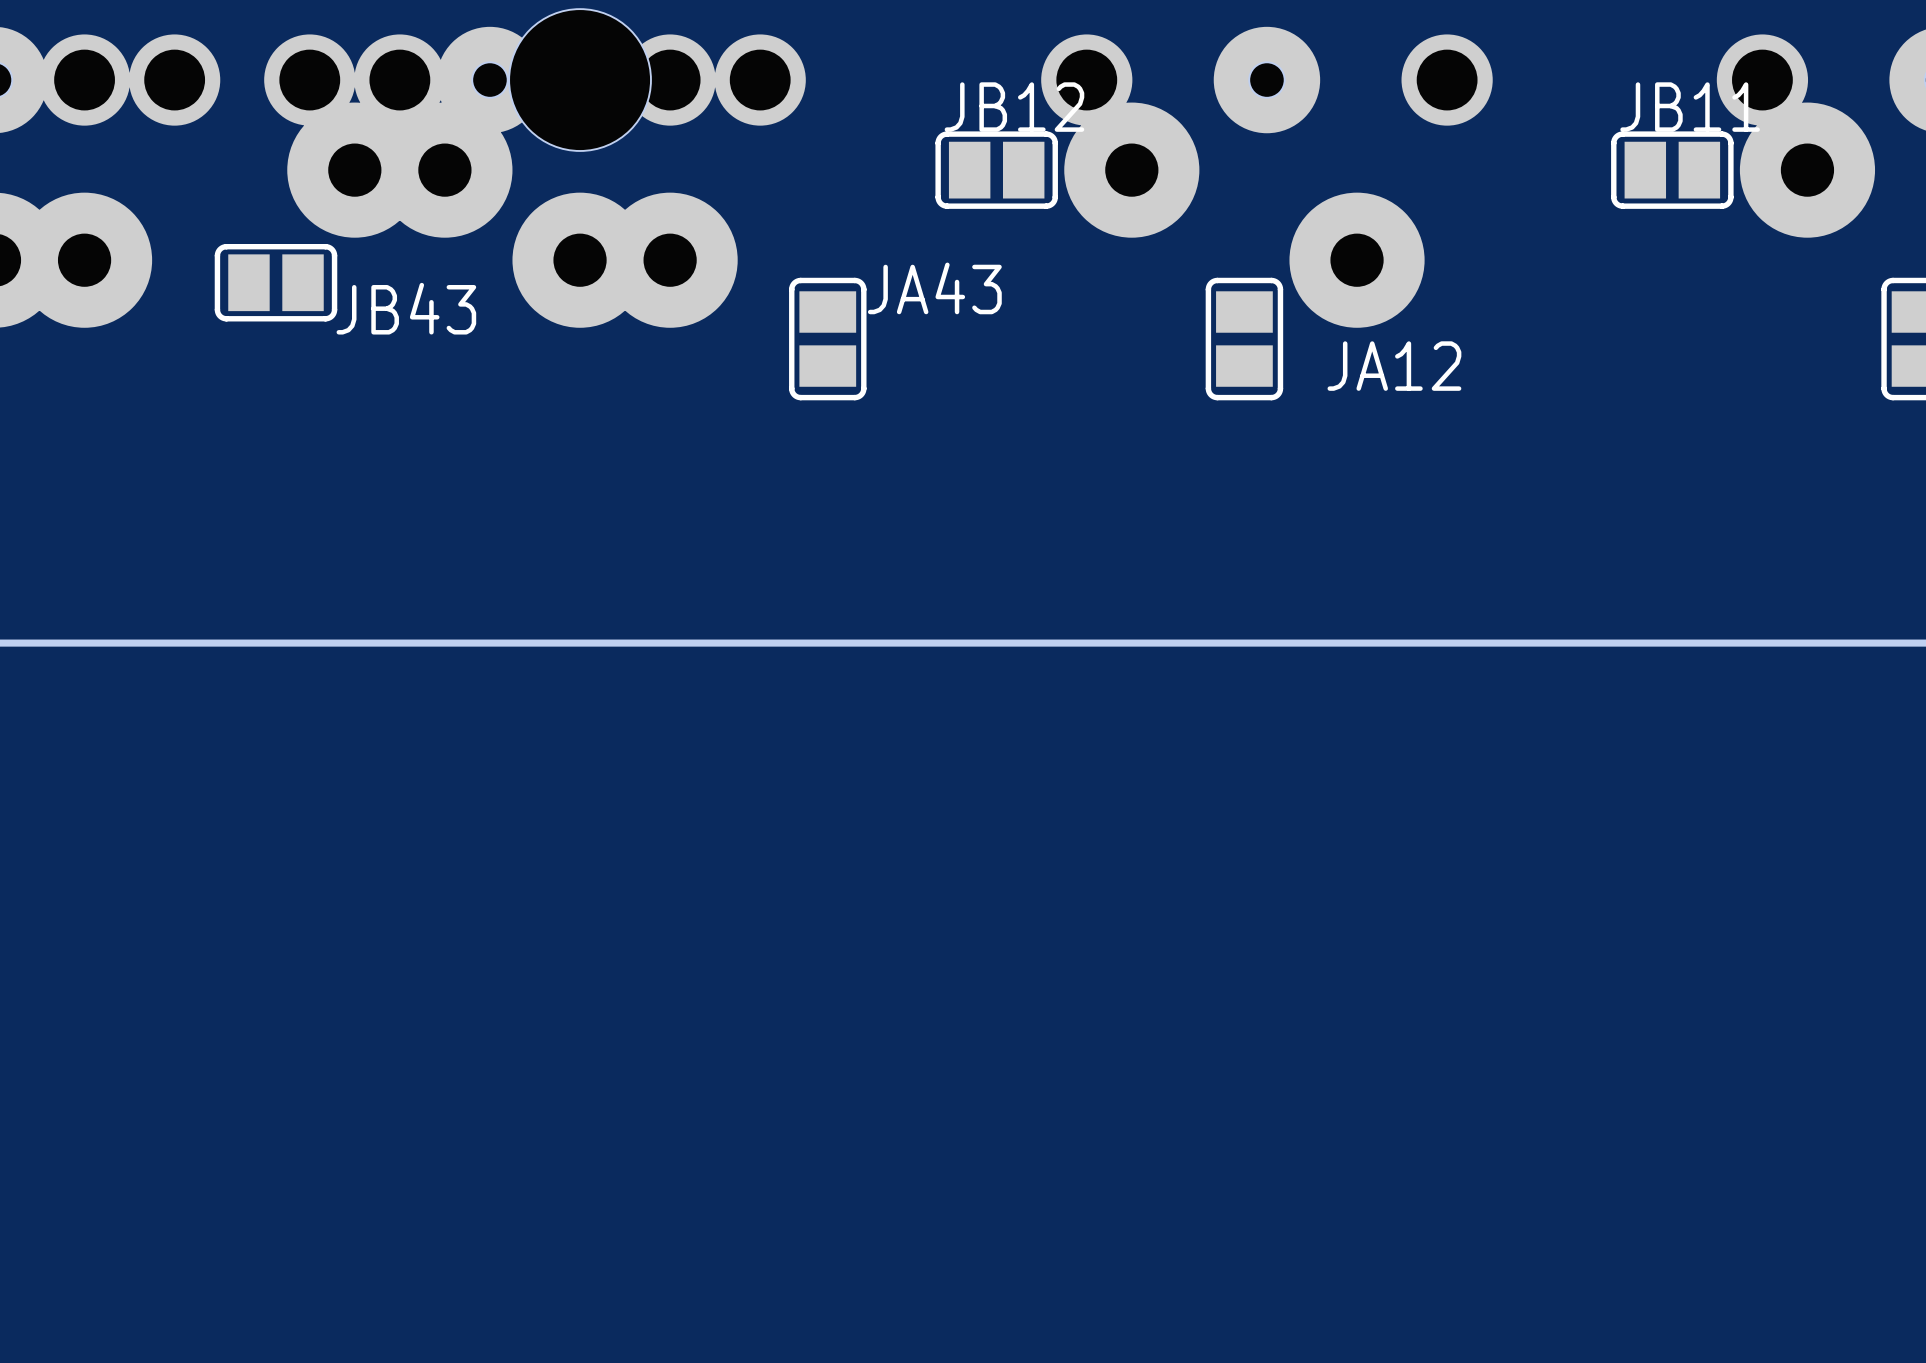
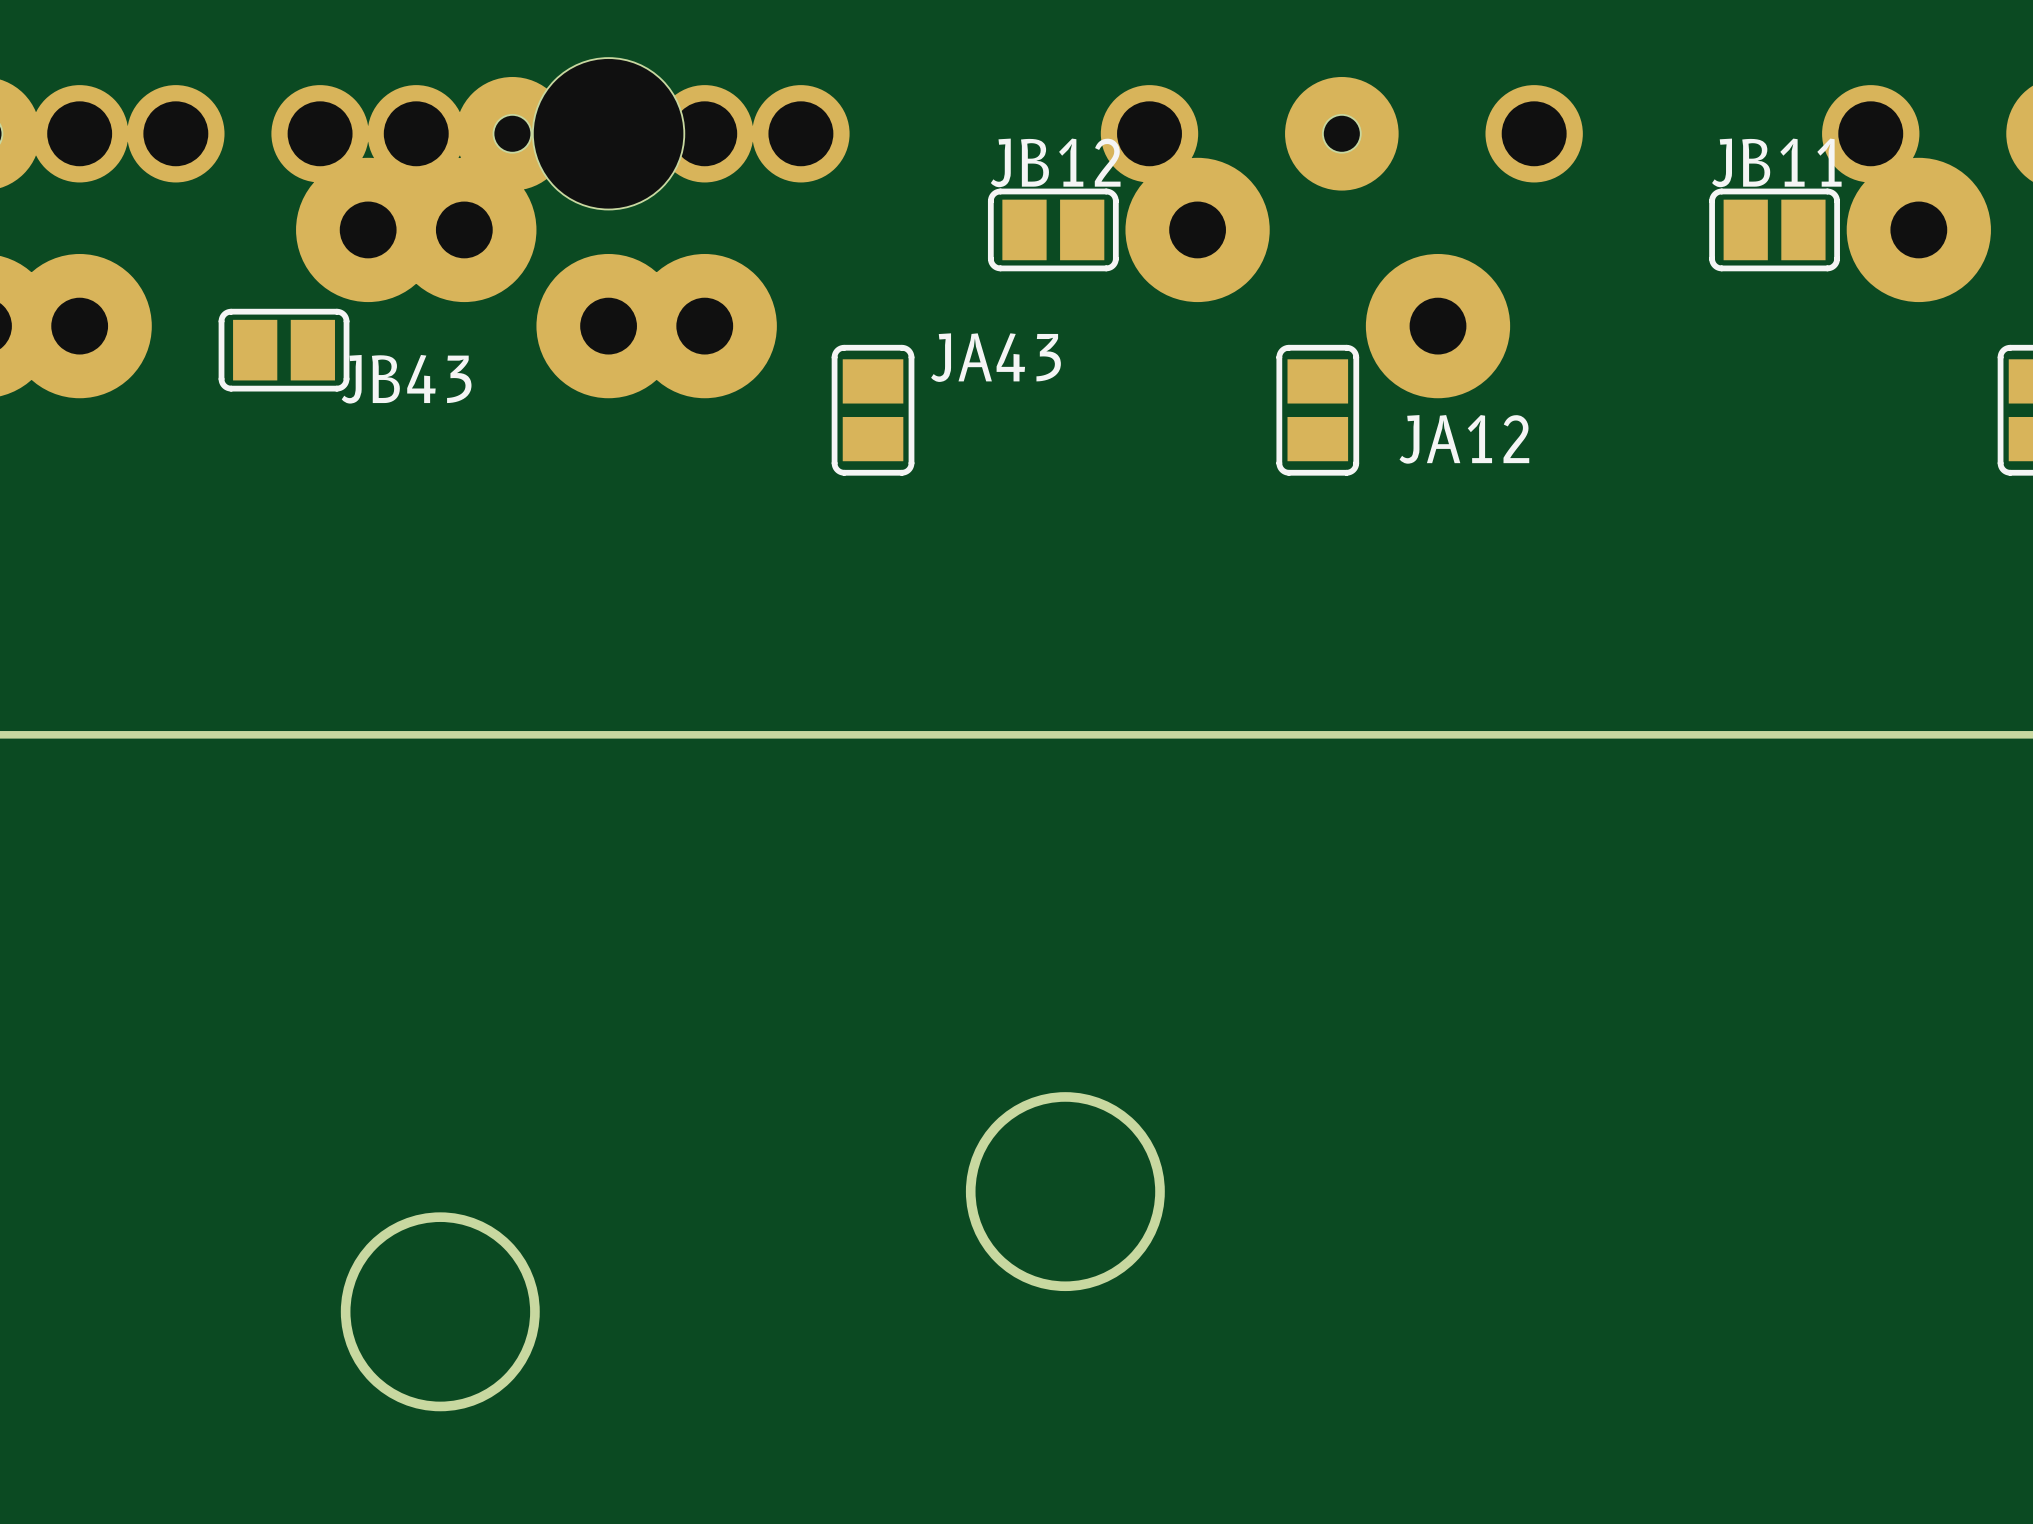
round board edge: none -> [965, 1092, 1165, 1292]
round board edge: none -> [340, 1212, 540, 1412]

